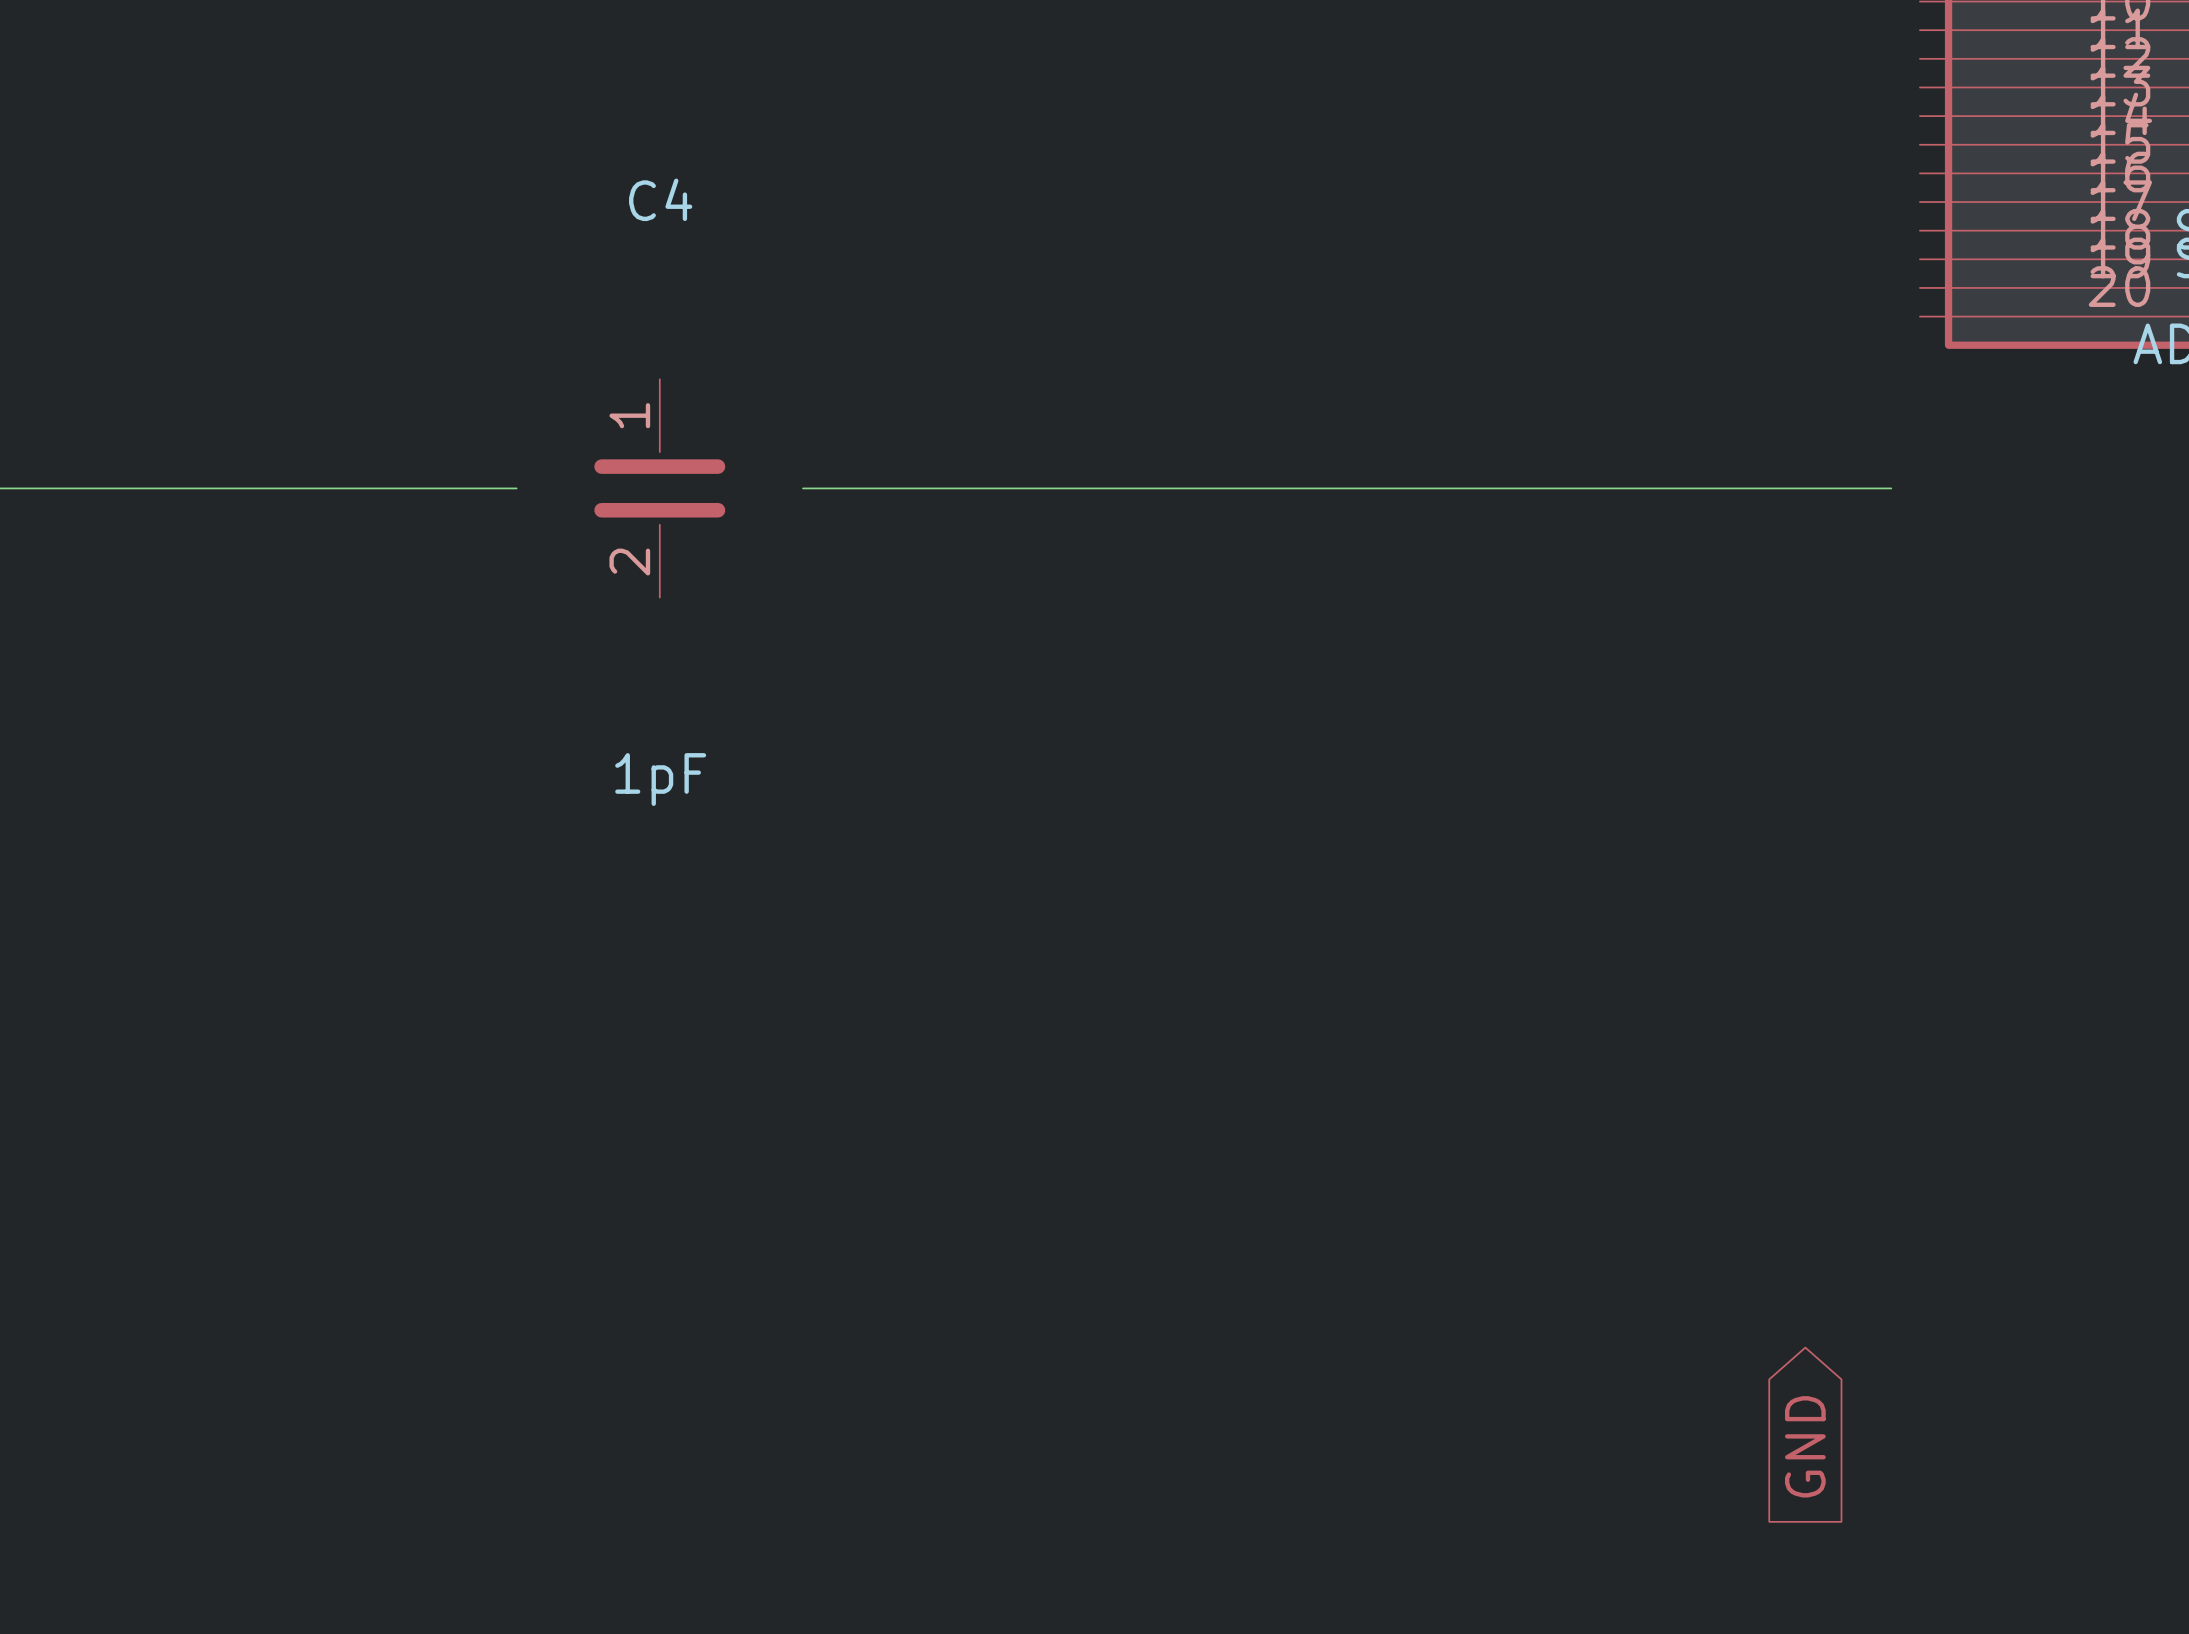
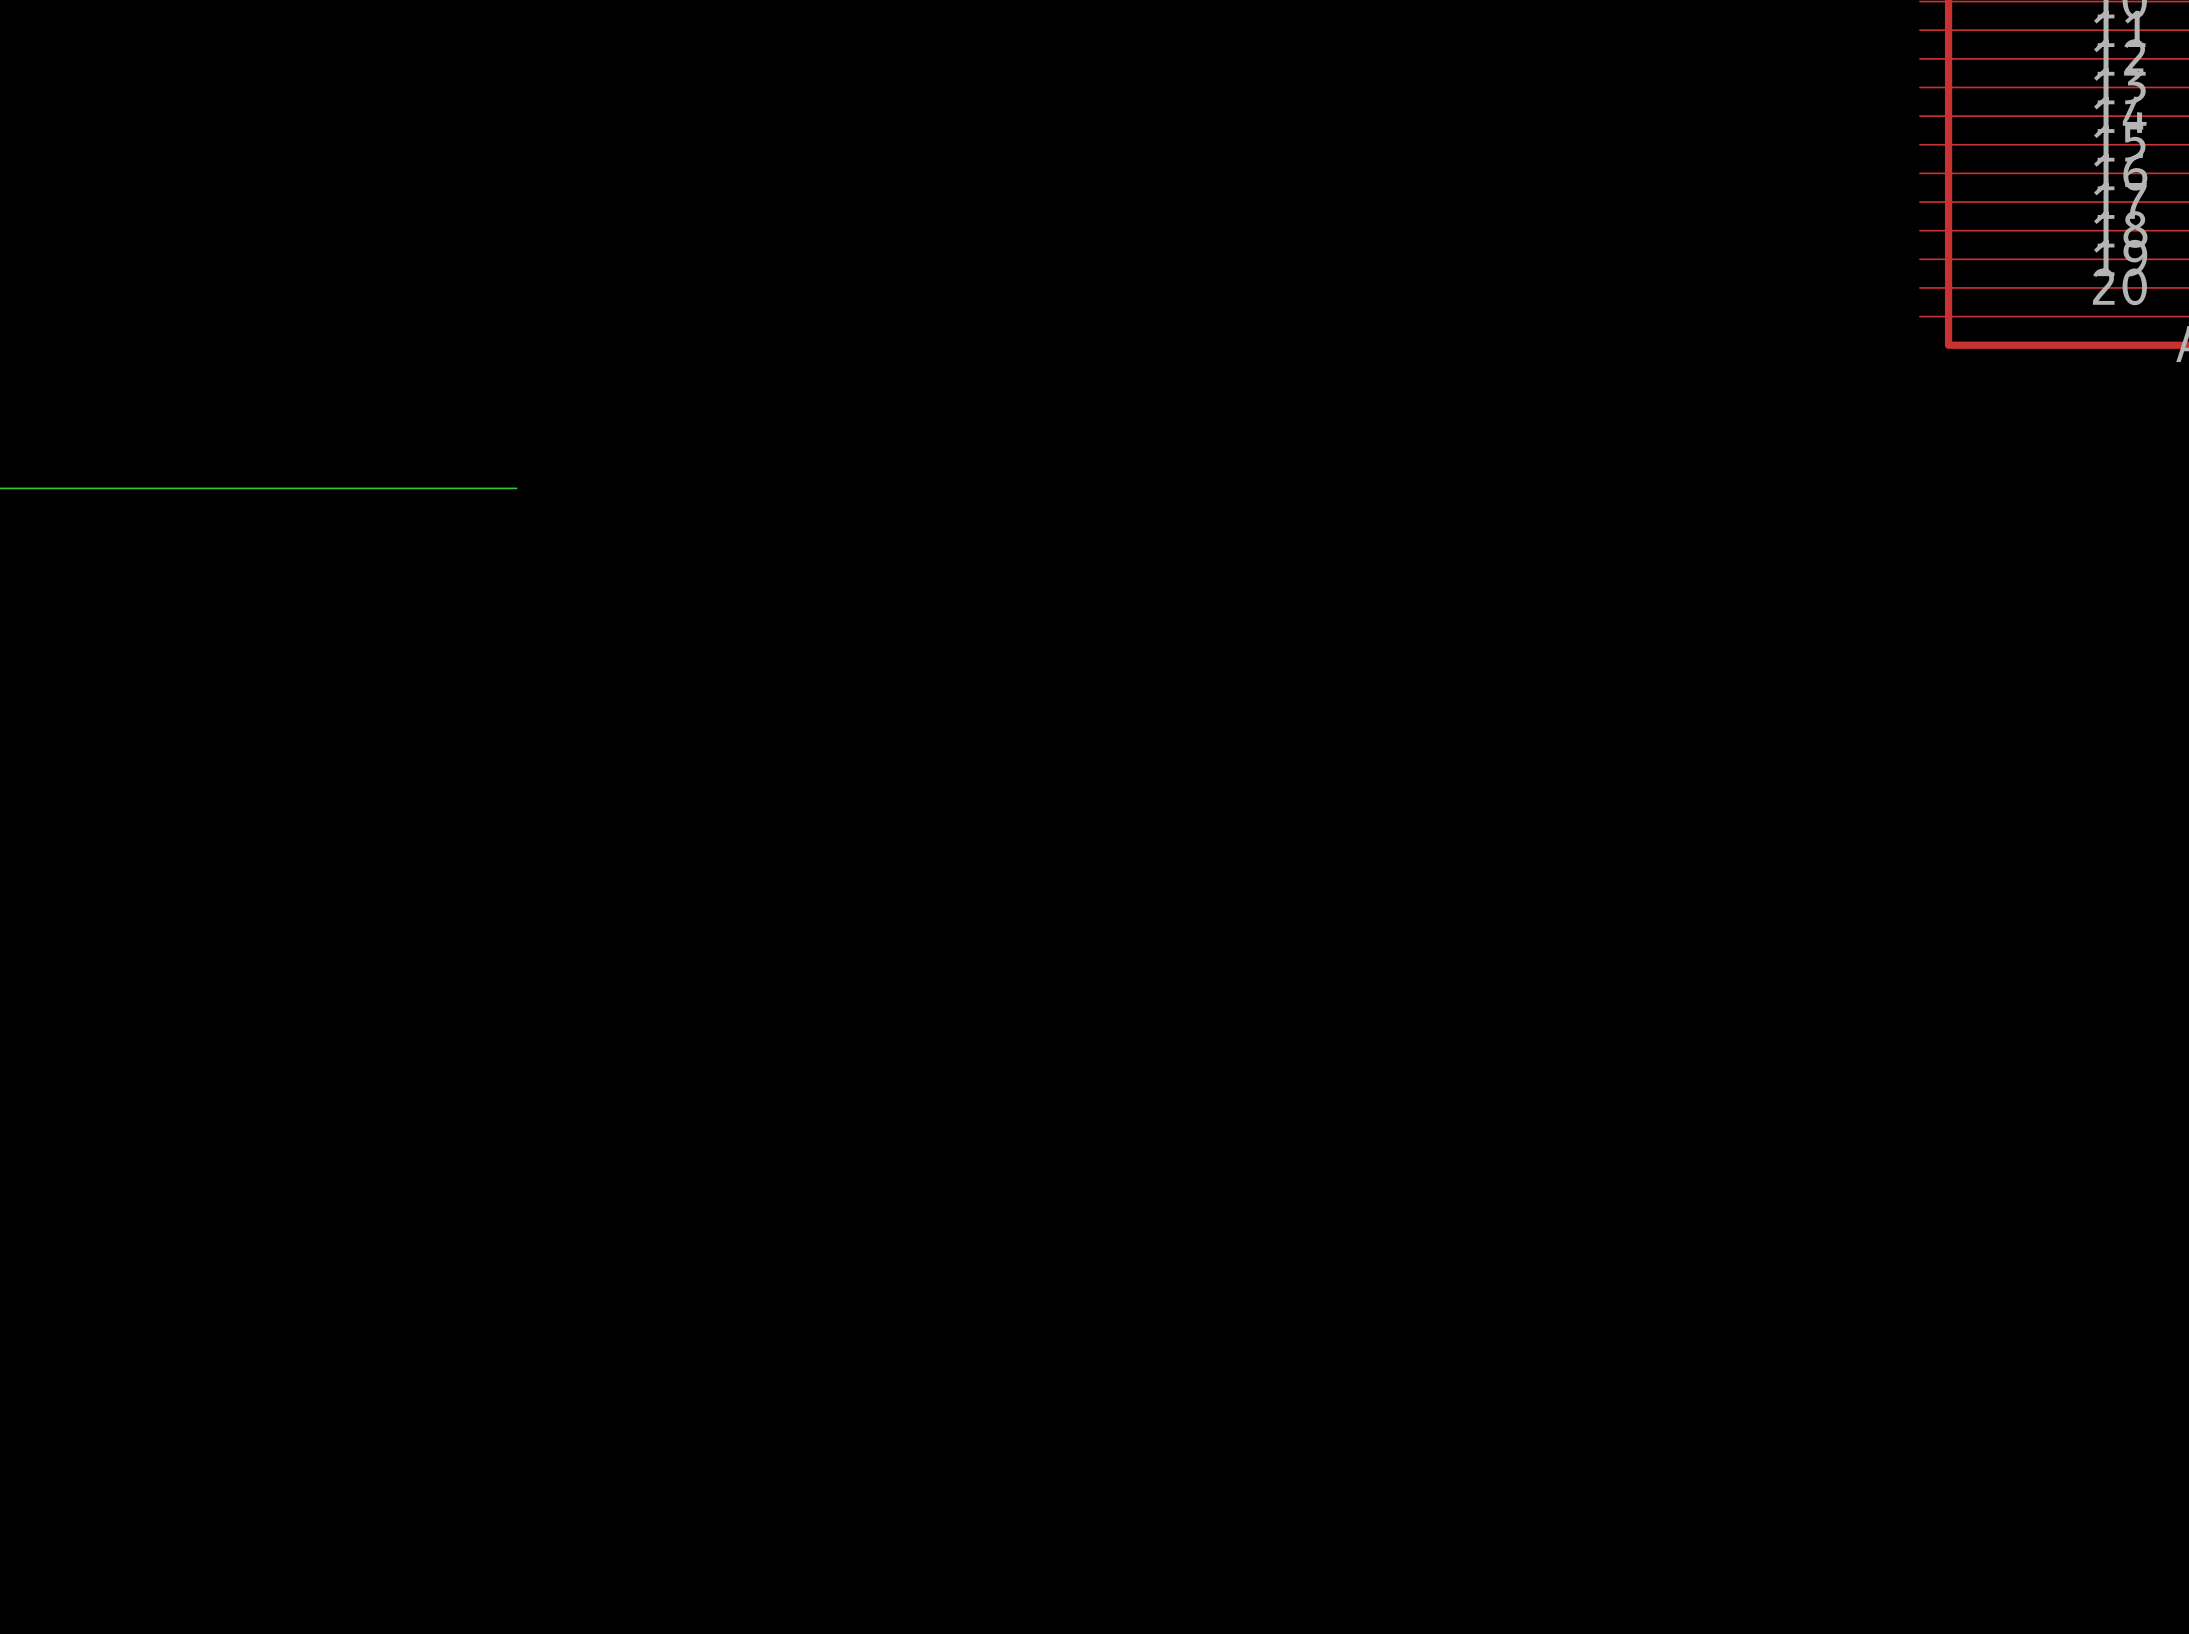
C4: 1pF (659, 488) -> none
wire: (802, 488) (1891, 488) -> none
global label: GND (1805, 1446) -> none

